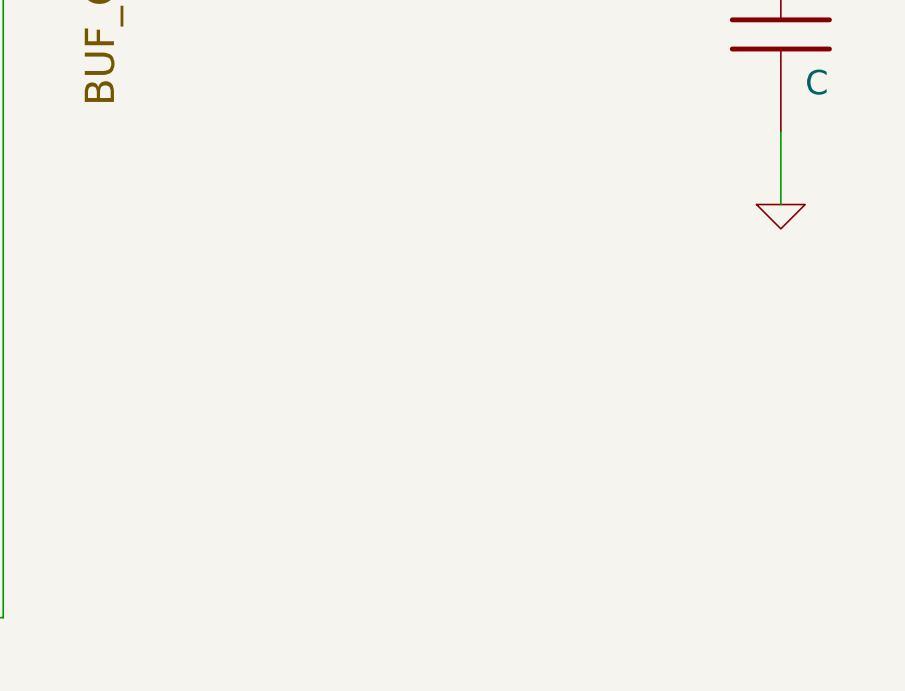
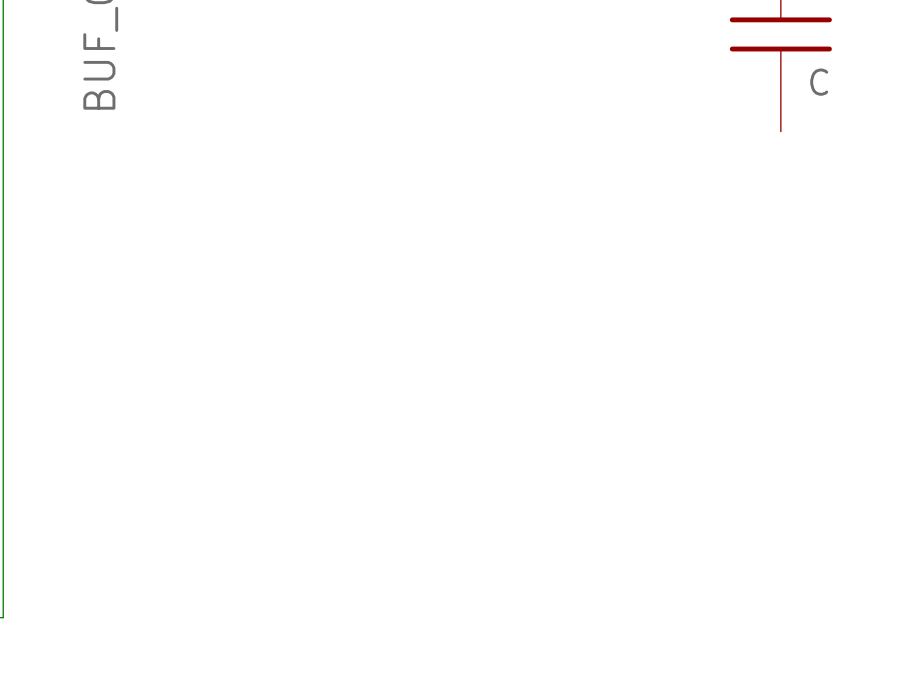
wire: (780, 131) (780, 204) -> none
power symbol: (780, 216) -> none

